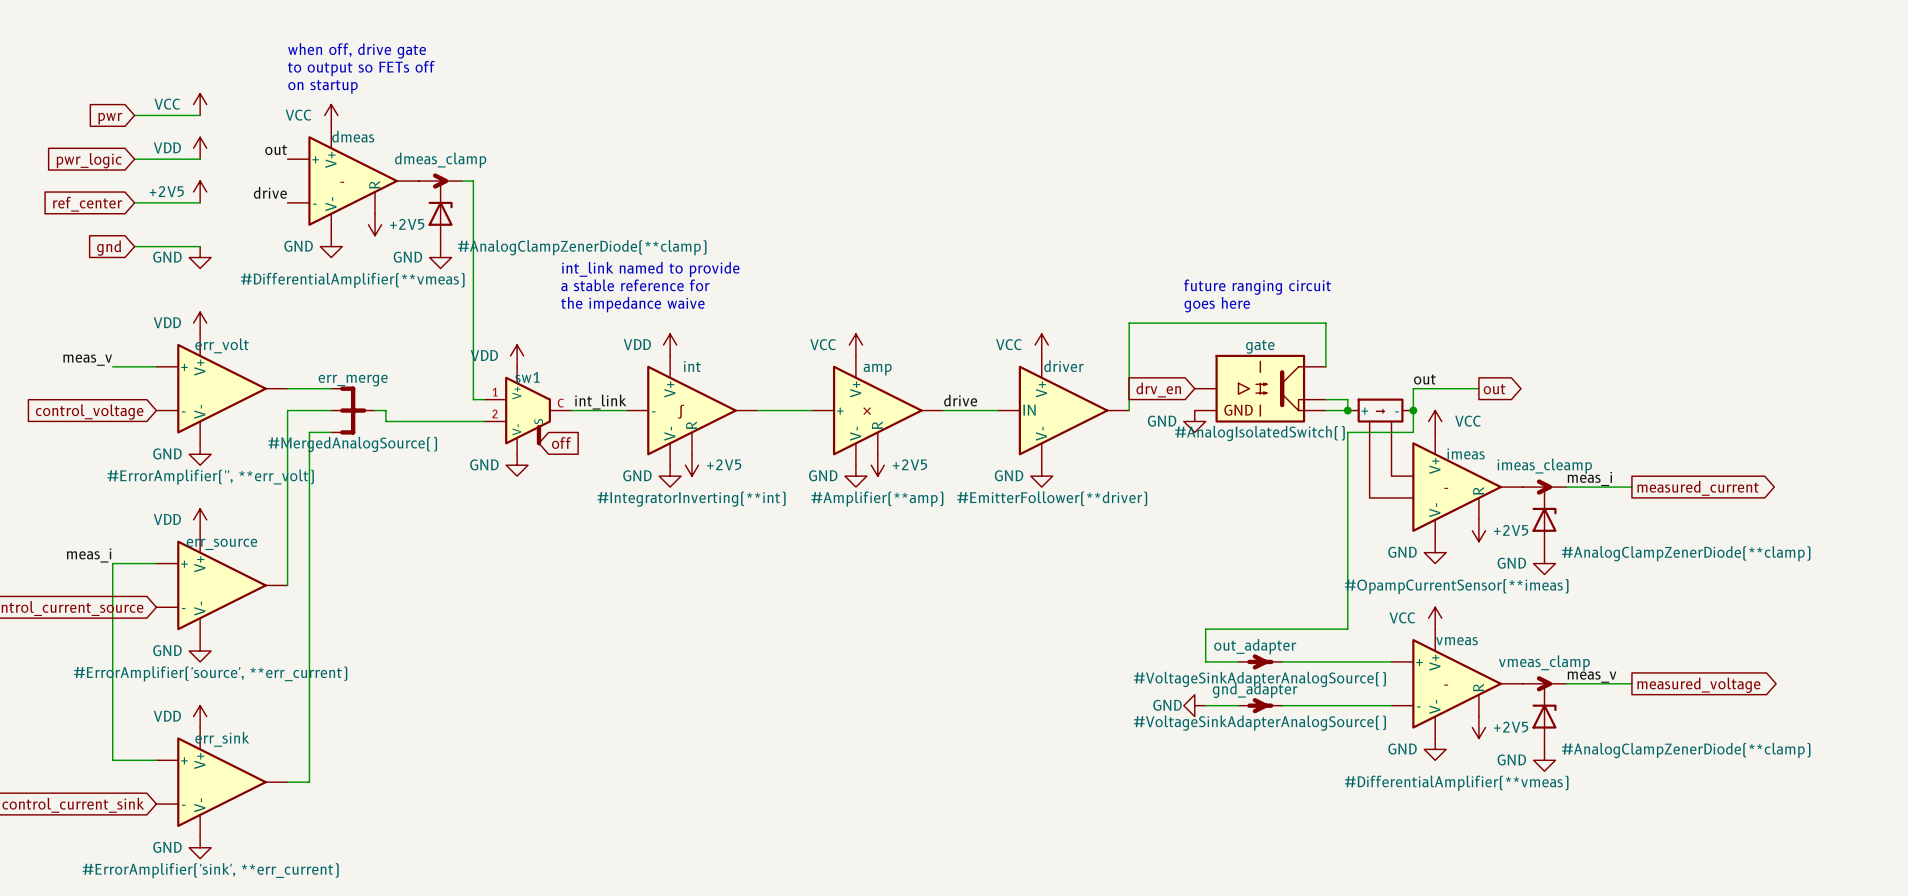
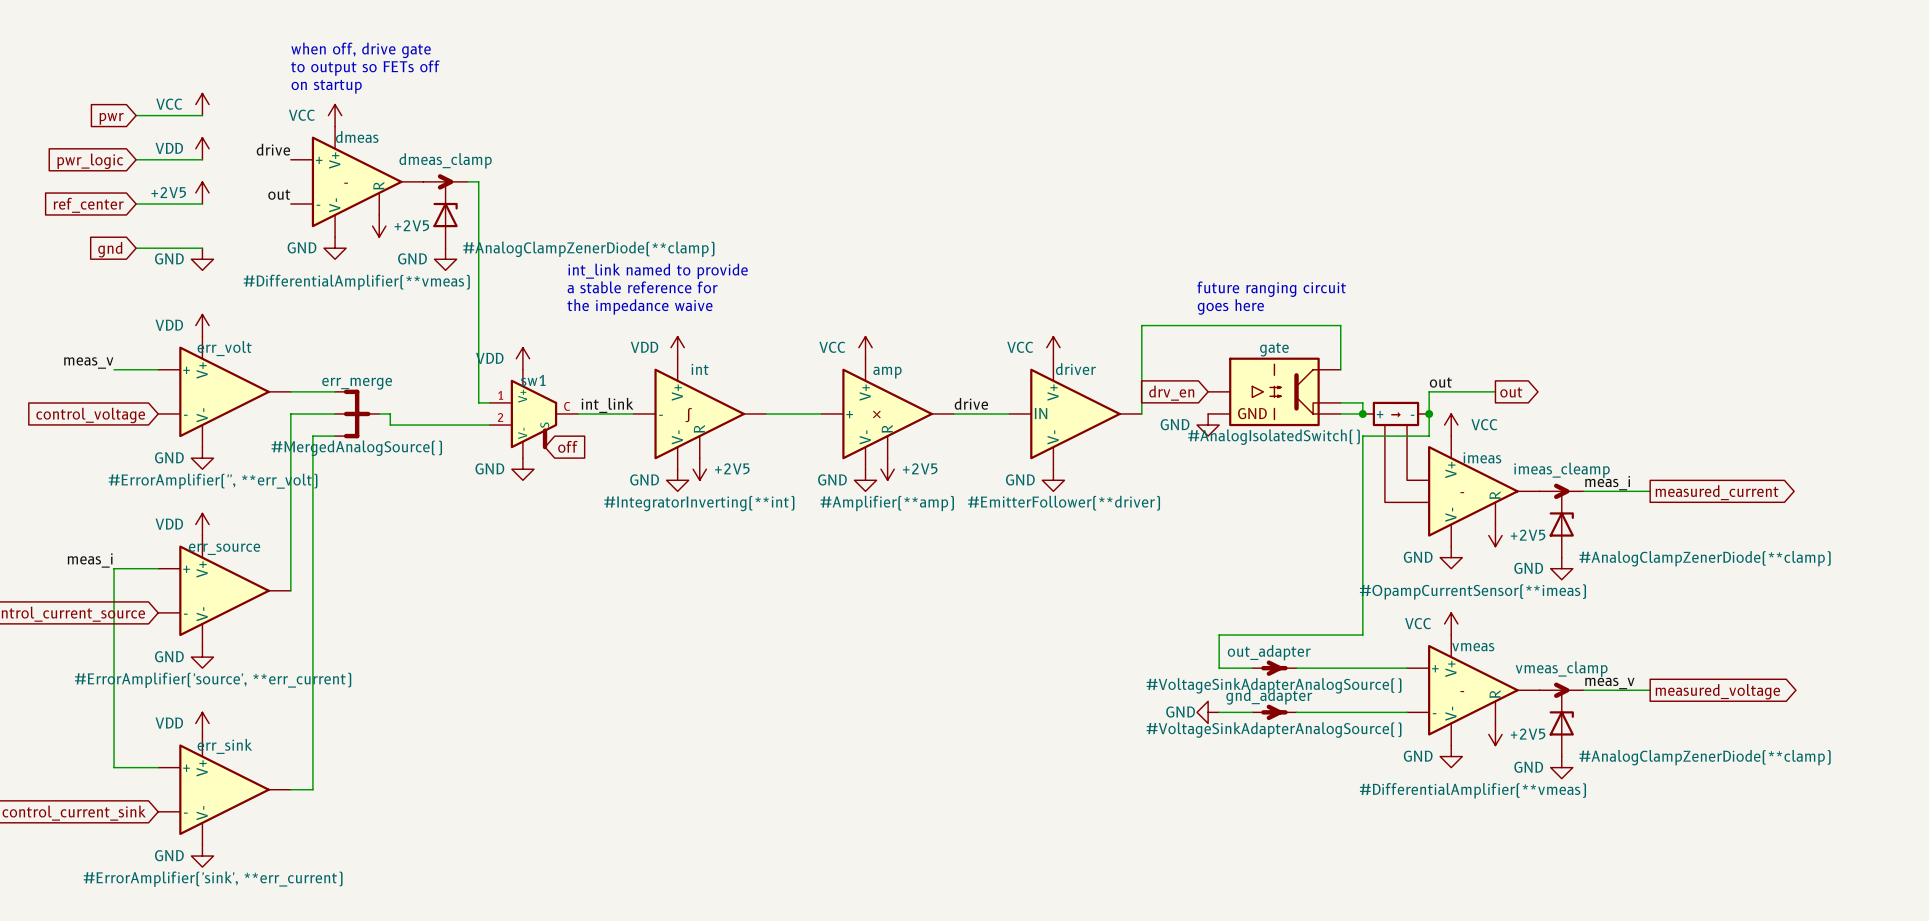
label: out (276, 149) -> drive (273, 149)
label: drive (270, 192) -> out (279, 194)

